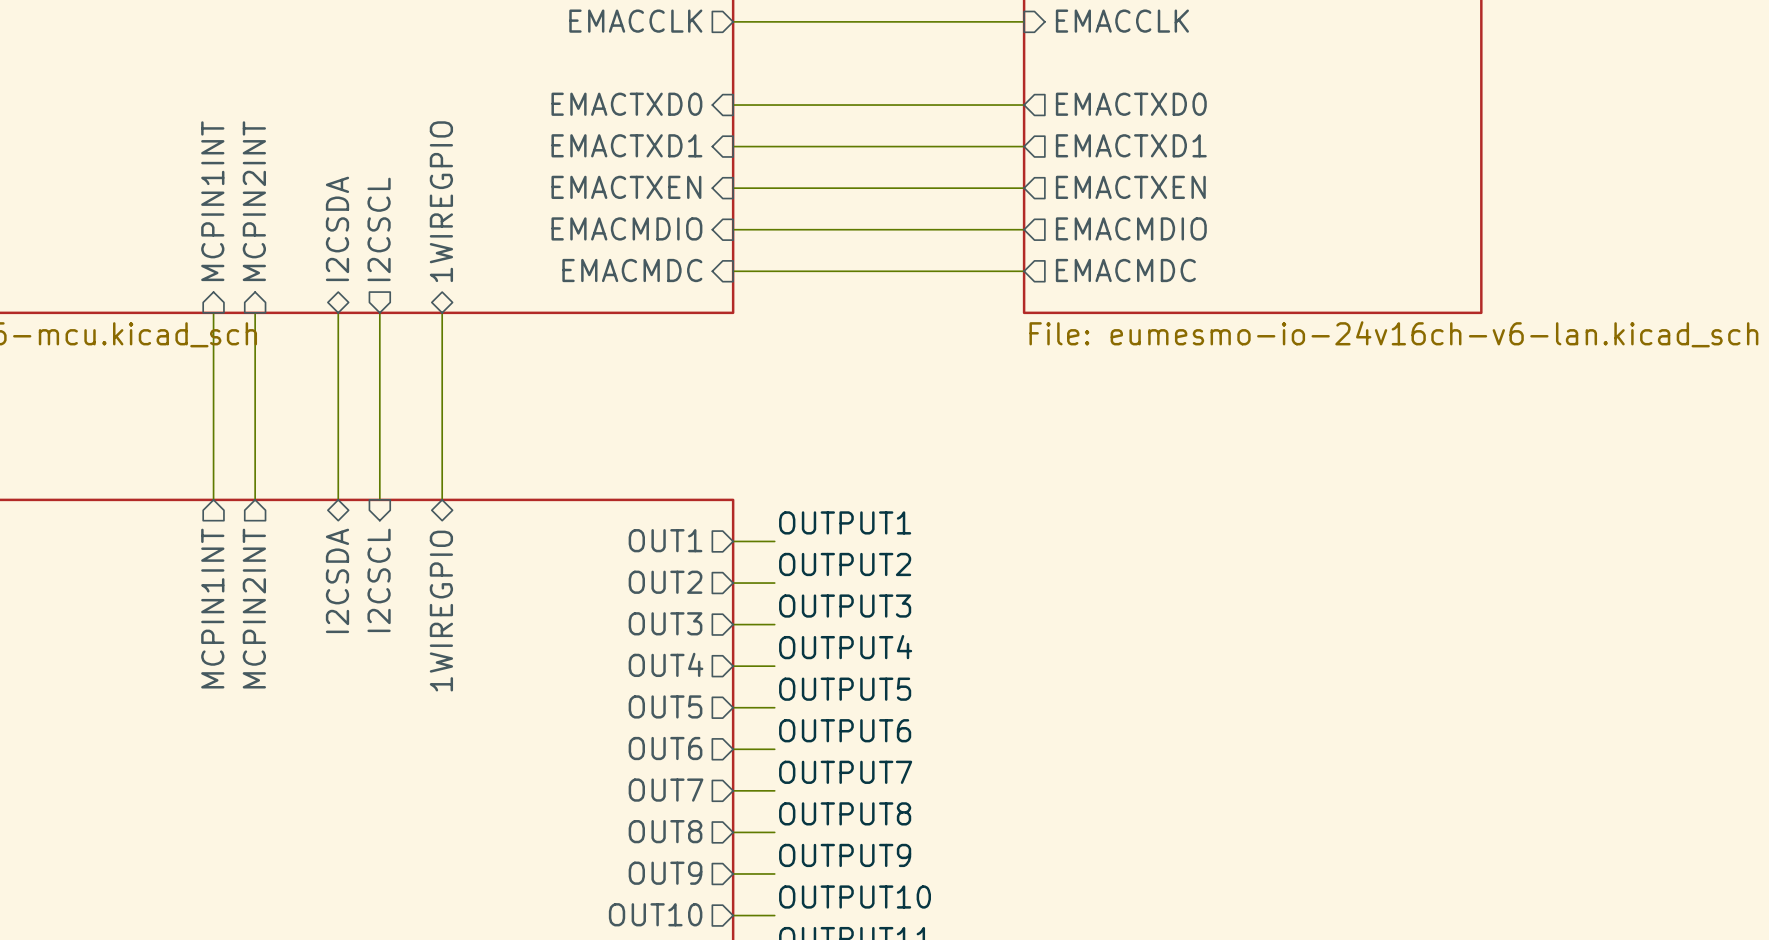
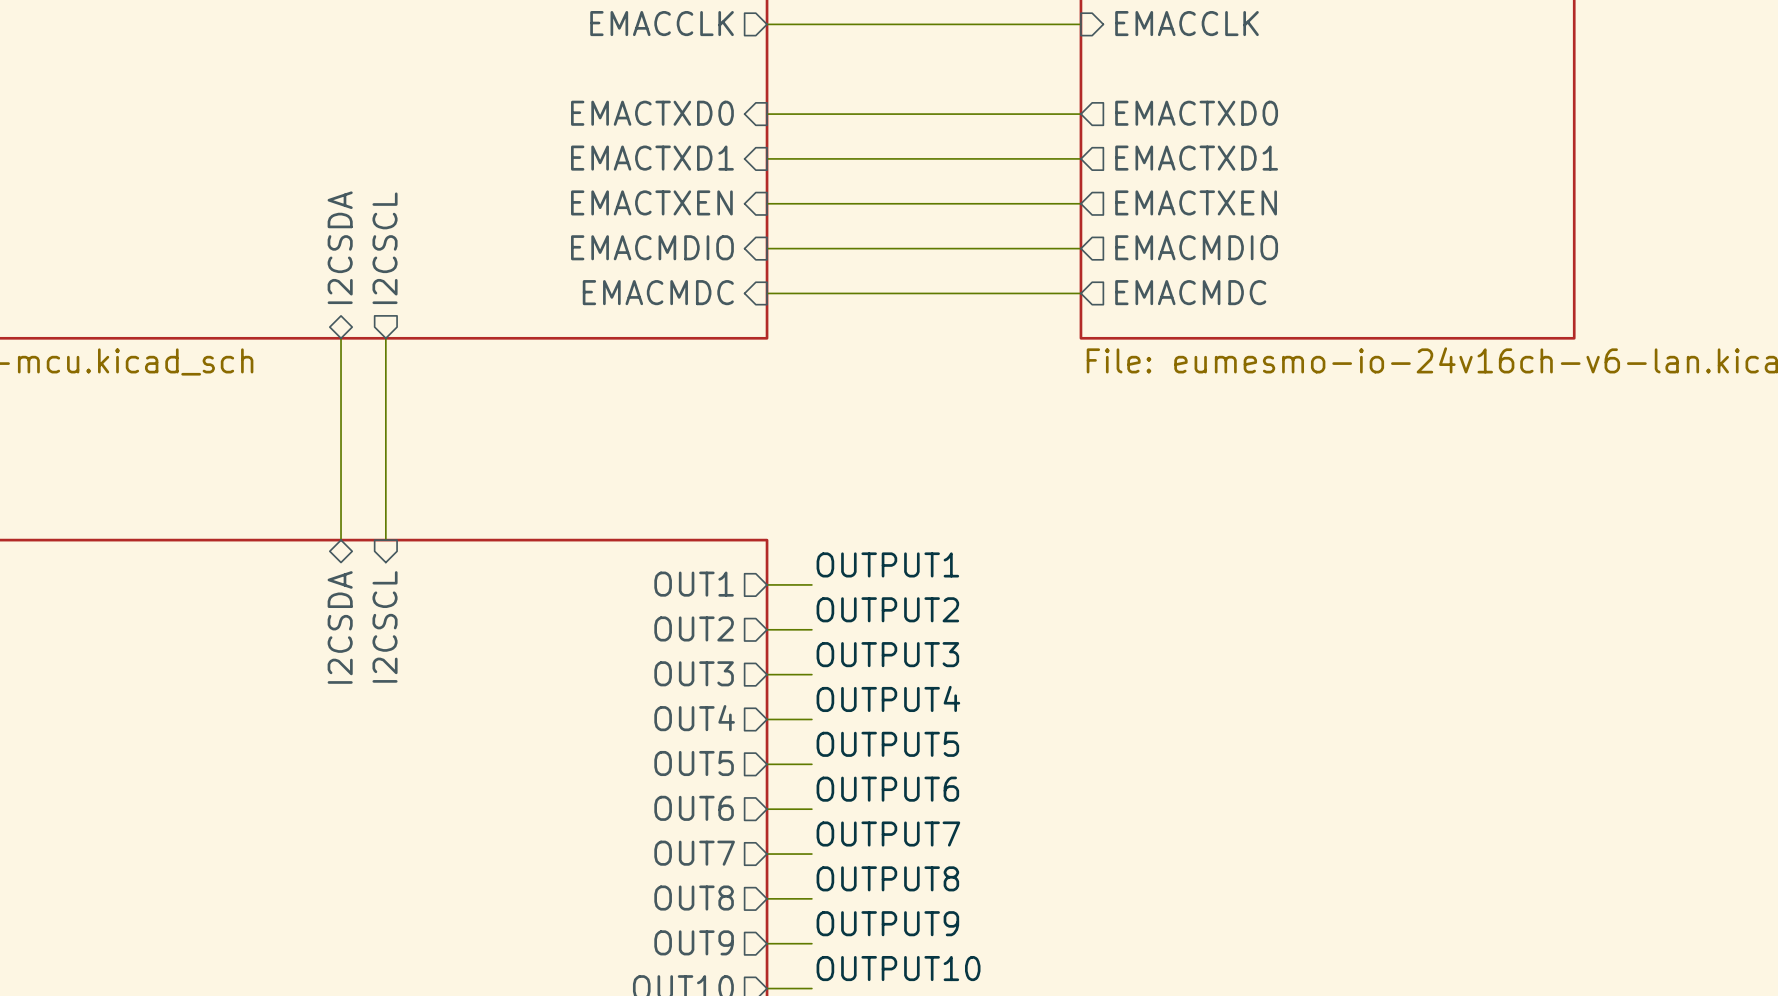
sheet pin: MCPIN1INT (212, 201) -> none
sheet pin: MCPIN2INT (254, 201) -> none
sheet pin: 1WIREGPIO (441, 201) -> none
wire: (213, 312) (213, 499) -> none
wire: (255, 312) (255, 499) -> none
wire: (442, 312) (442, 499) -> none
sheet pin: MCPIN1INT (212, 608) -> none
sheet pin: MCPIN2INT (254, 608) -> none
sheet pin: 1WIREGPIO (441, 611) -> none

